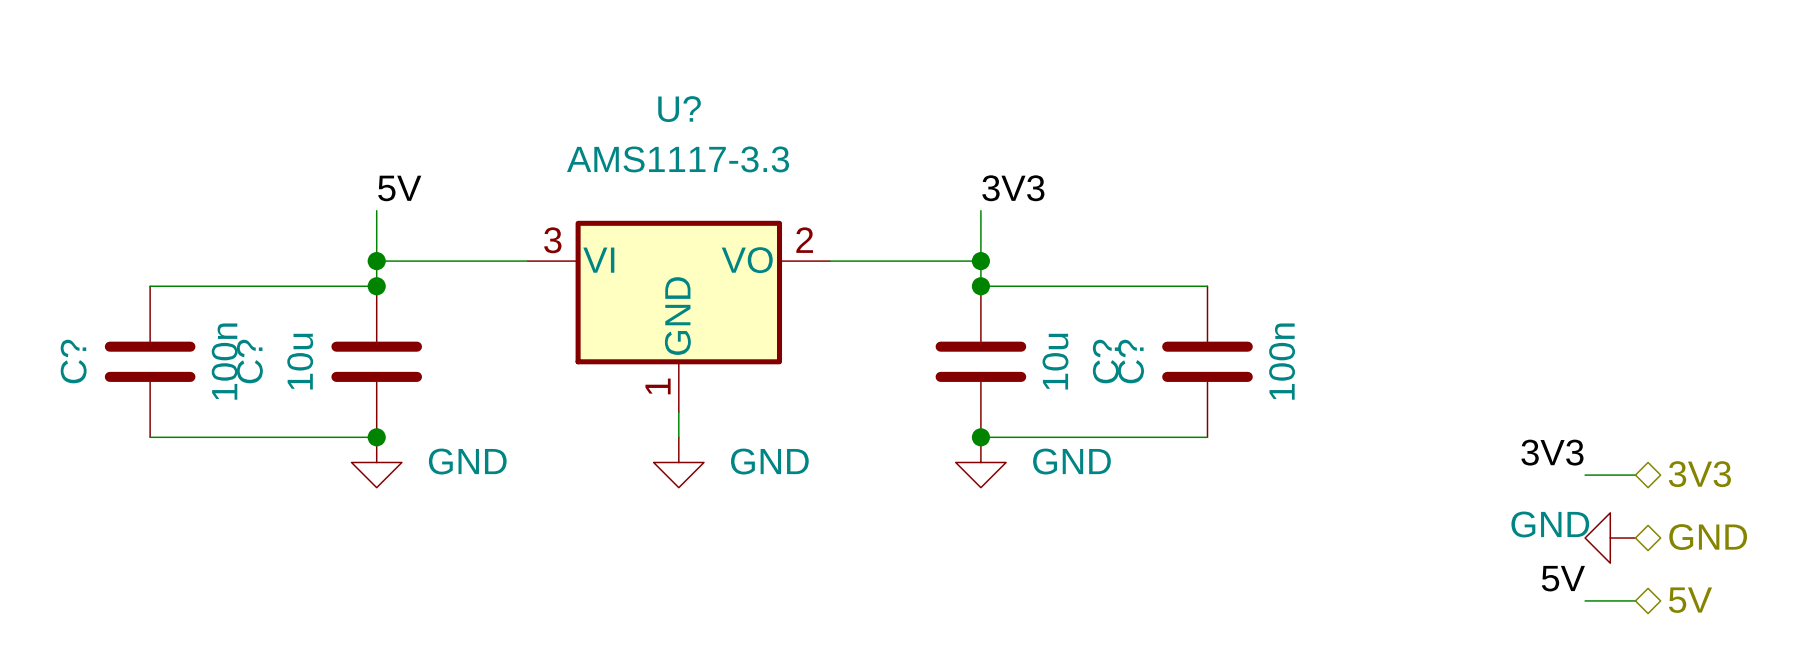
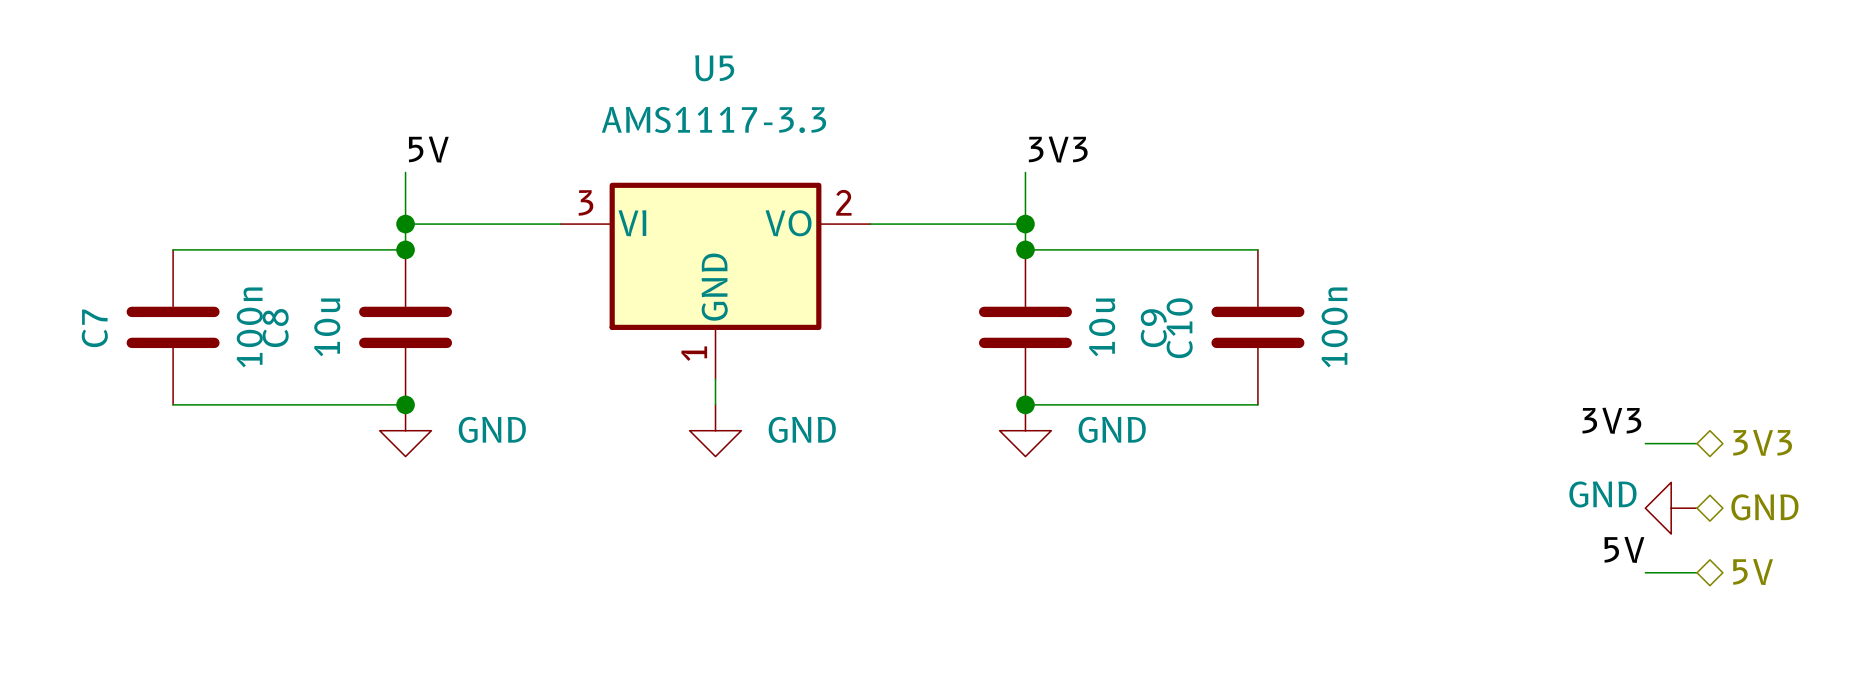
U? name: U? (679, 109) -> U5 (714, 68)
C? name: C? (73, 361) -> C7 (94, 328)
C? name: C? (249, 361) -> C8 (275, 328)
C? name: C? (1105, 361) -> C9 (1153, 328)
C? name: C? (1131, 361) -> C10 (1179, 328)

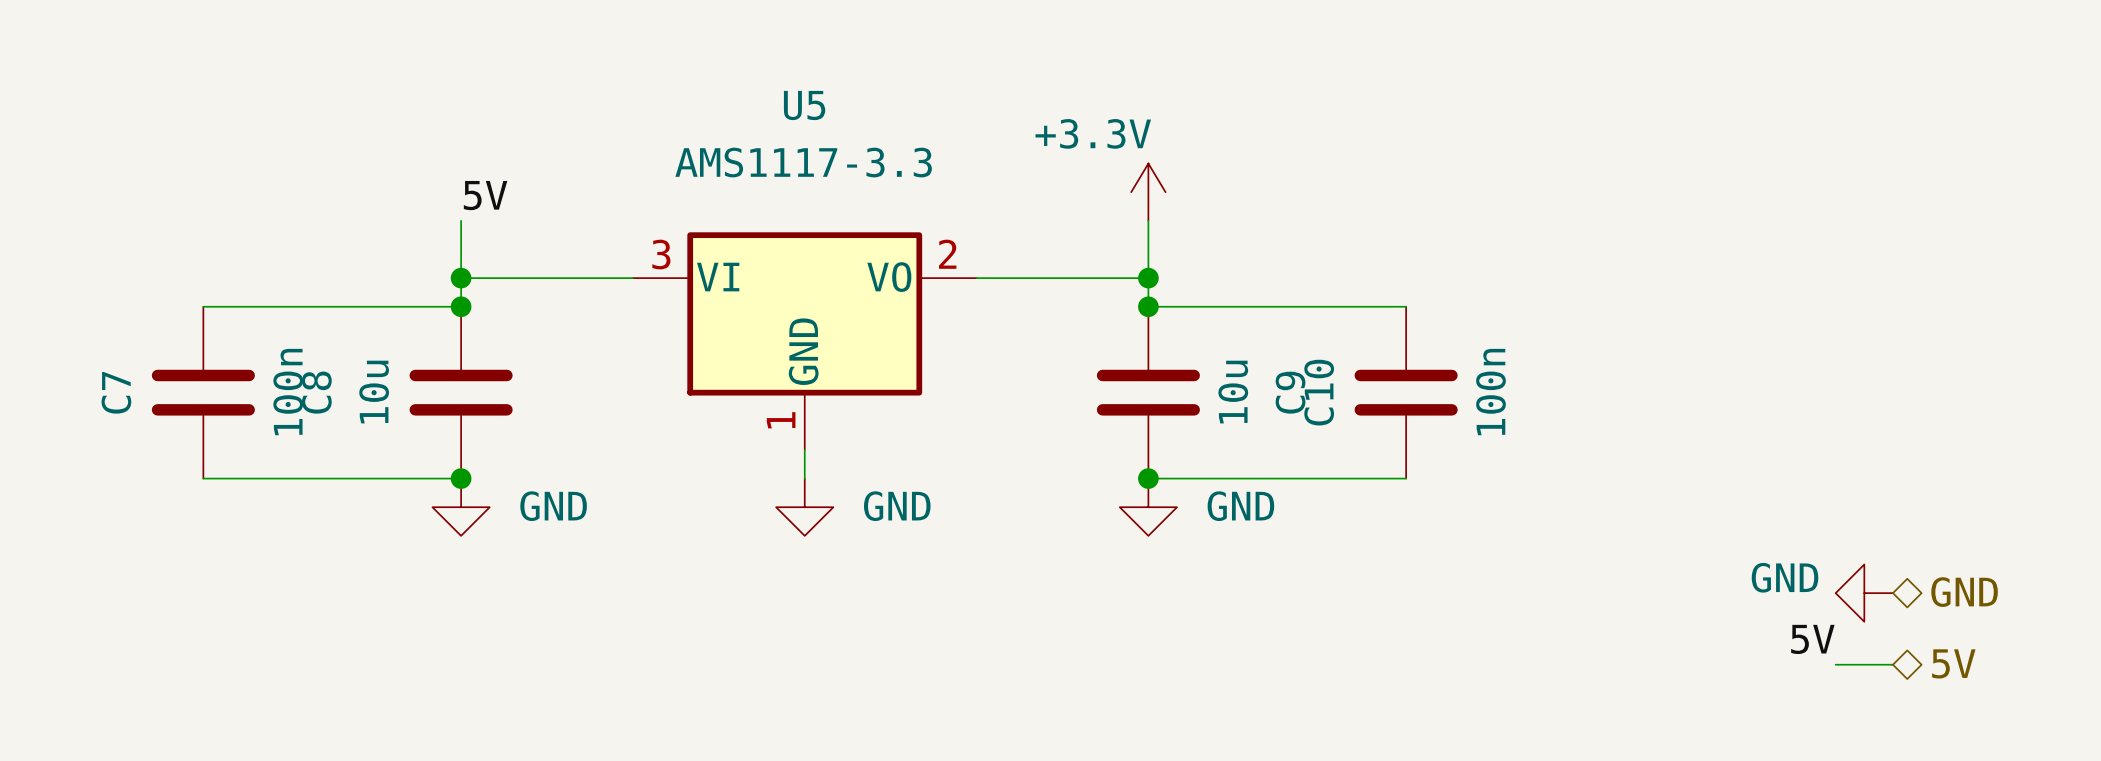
power symbol: none -> +3.3V (1148, 192)
label: 3V3 (1058, 149) -> none
label: 3V3 (1611, 420) -> none
hierarchical label: 3V3 (1762, 442) -> none
wire: (1645, 443) (1697, 443) -> none

